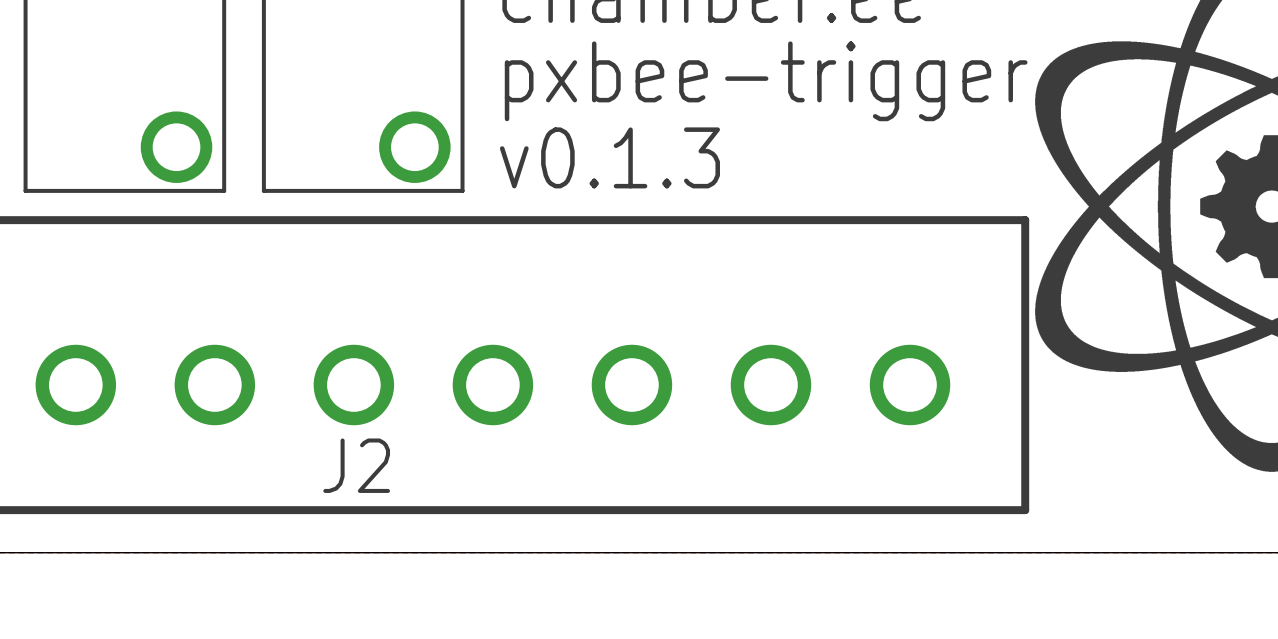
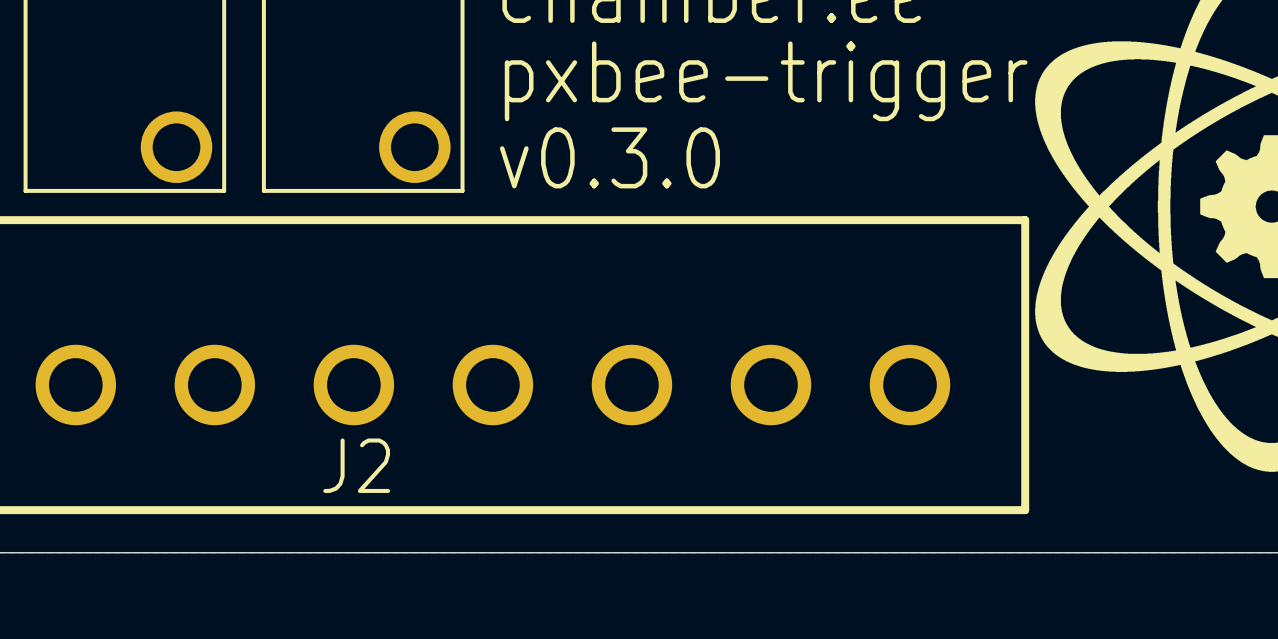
text: v0.1.3 (609, 157) -> v0.3.0 (609, 157)

